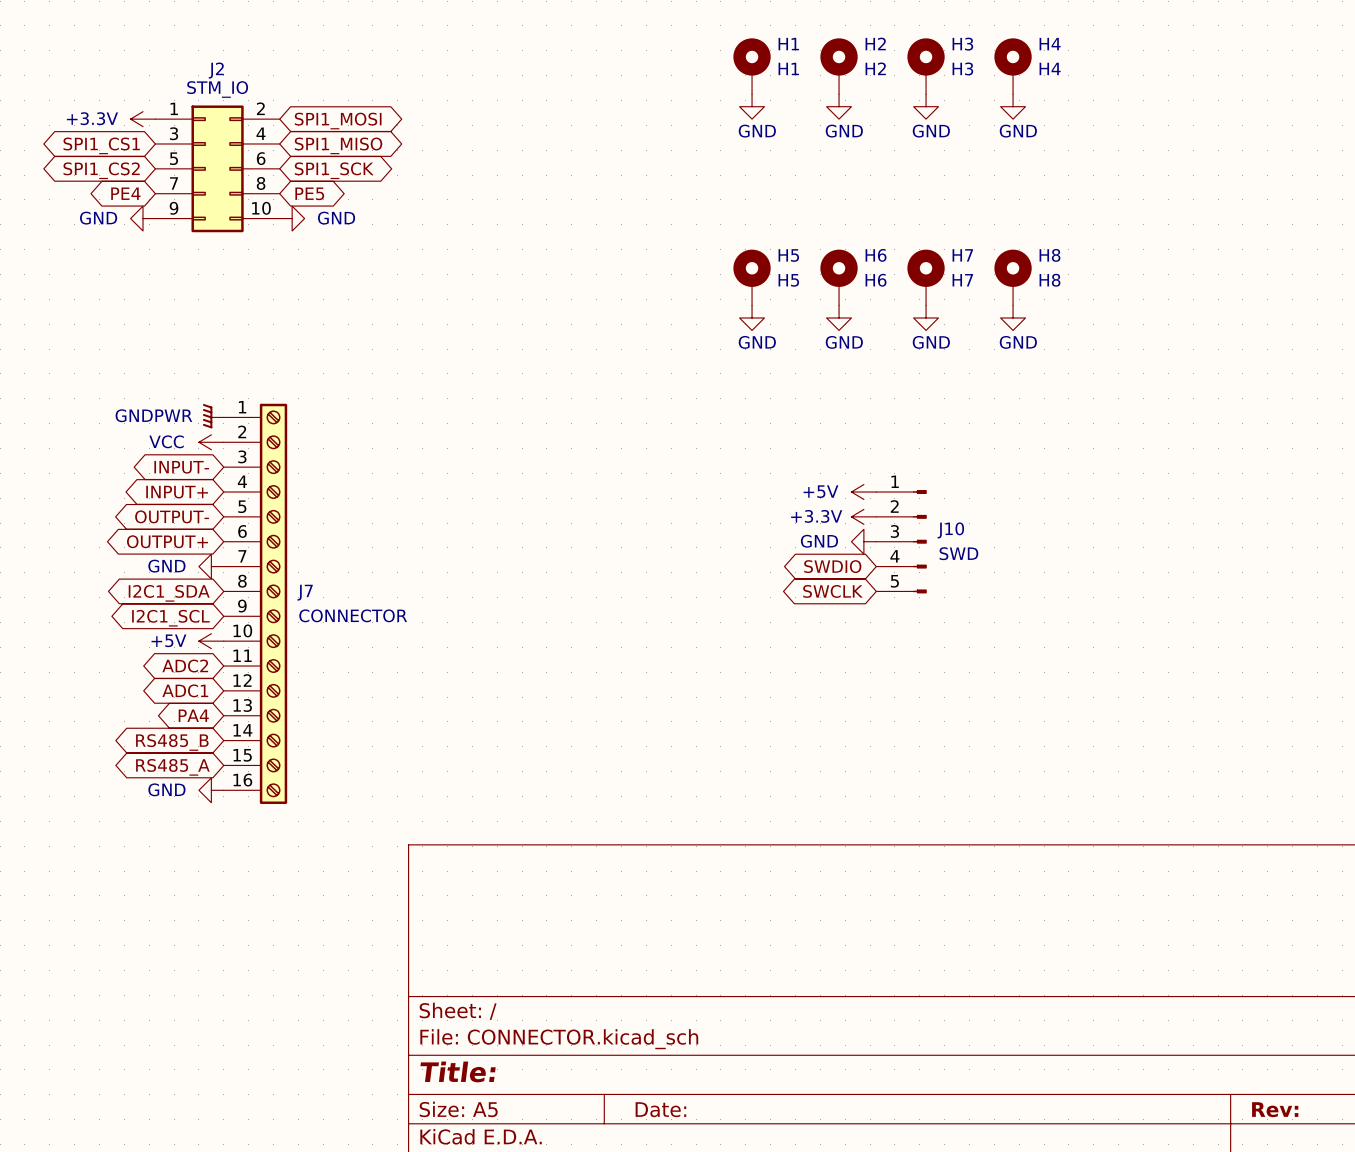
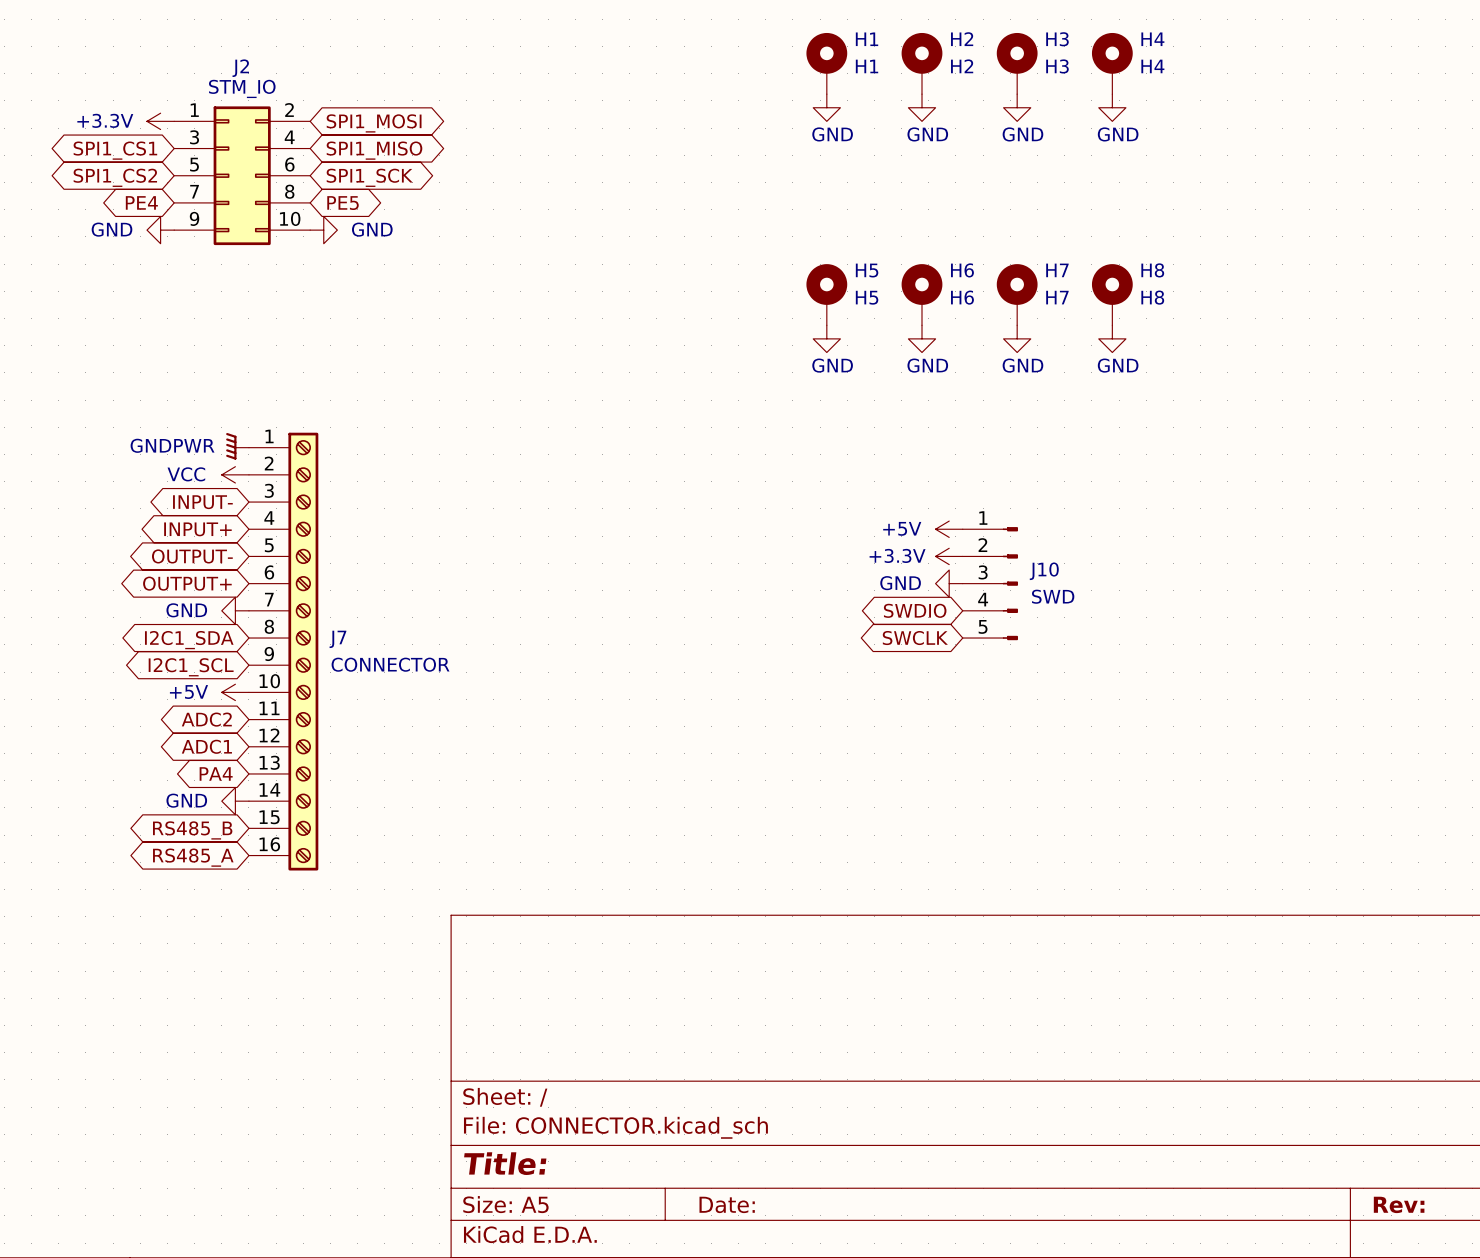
global label: RS485_B (172, 742) -> none
global label: RS485_A (172, 767) -> RS485_B (192, 830)
power symbol position: GND (211, 790) -> GND (235, 801)
global label: none -> RS485_A (193, 857)

